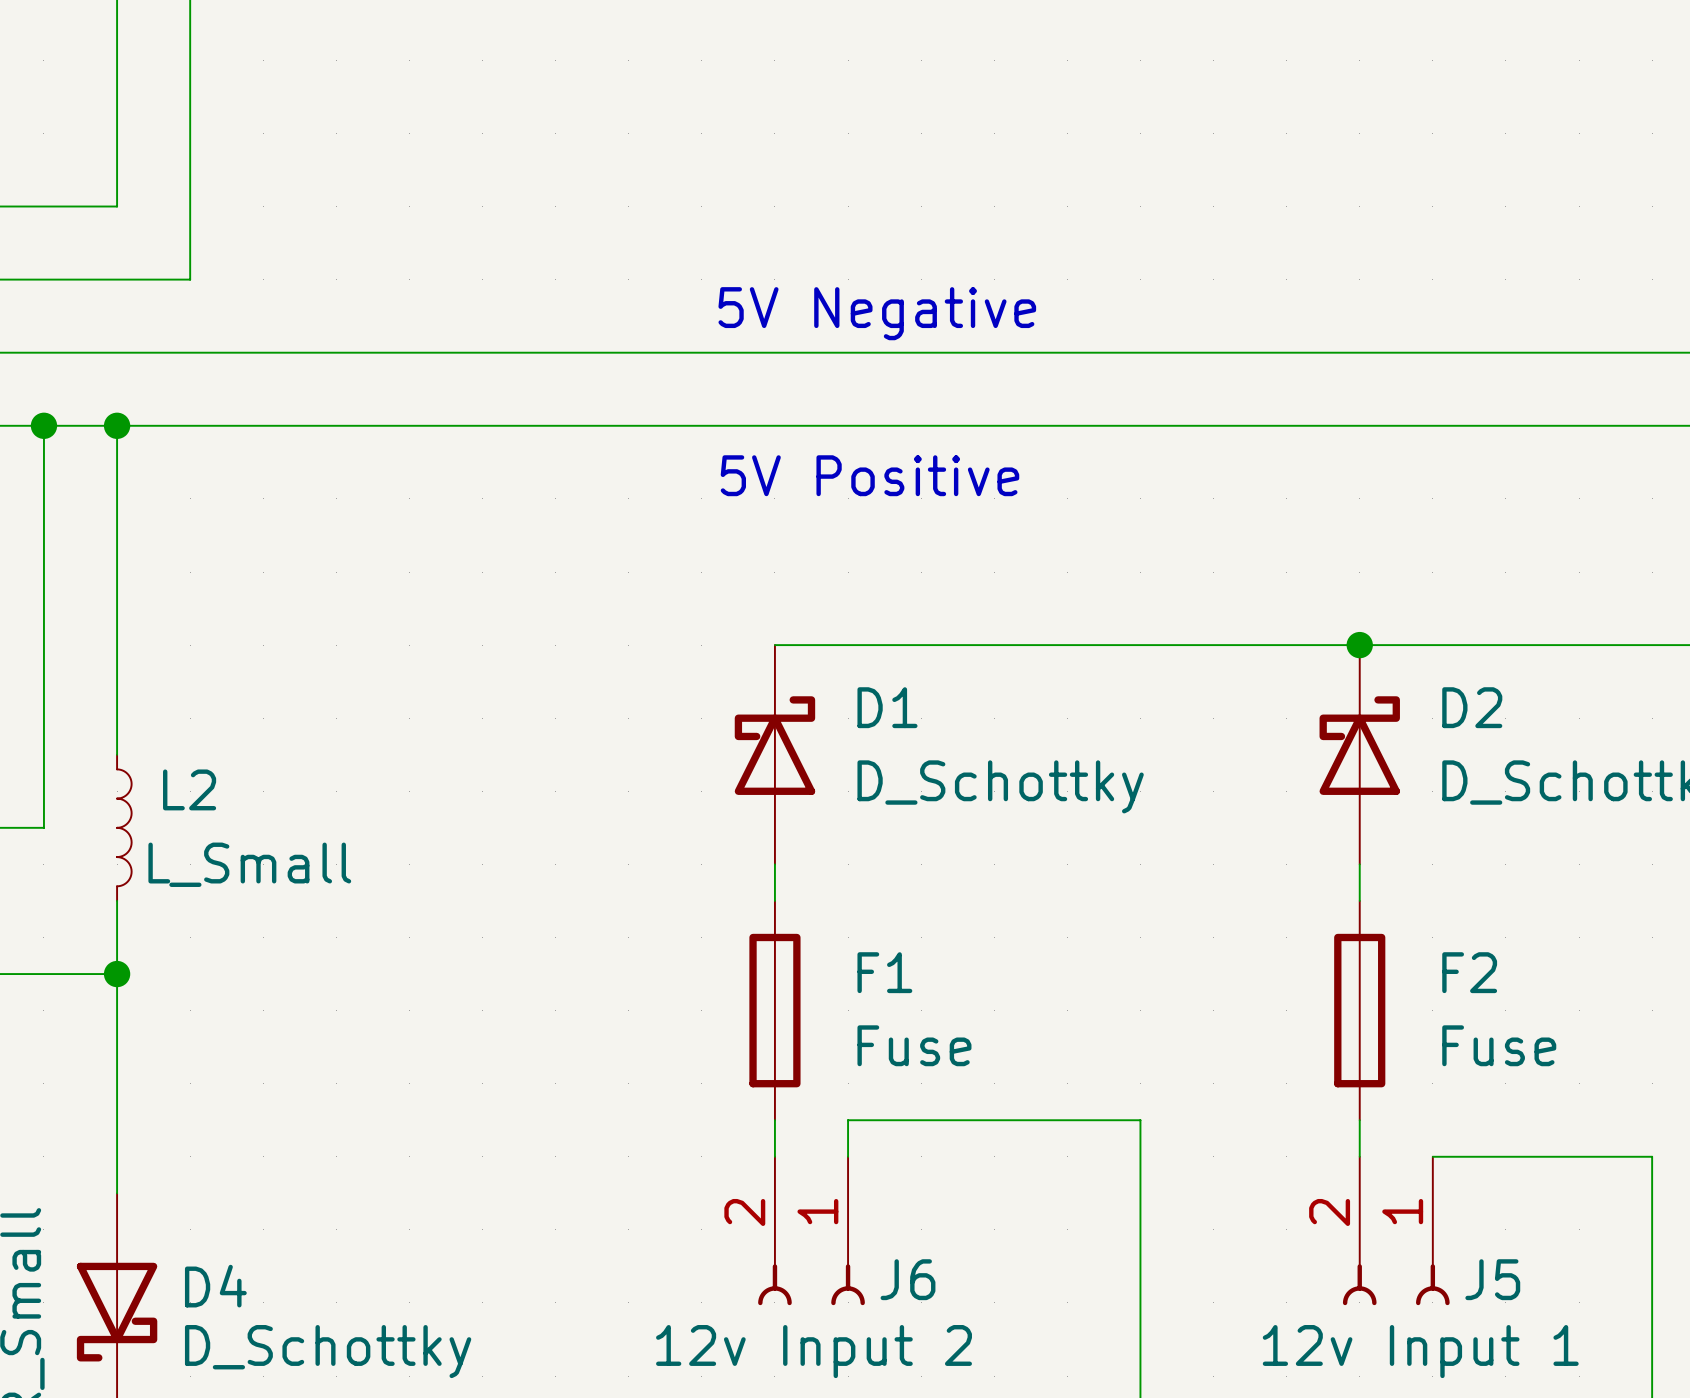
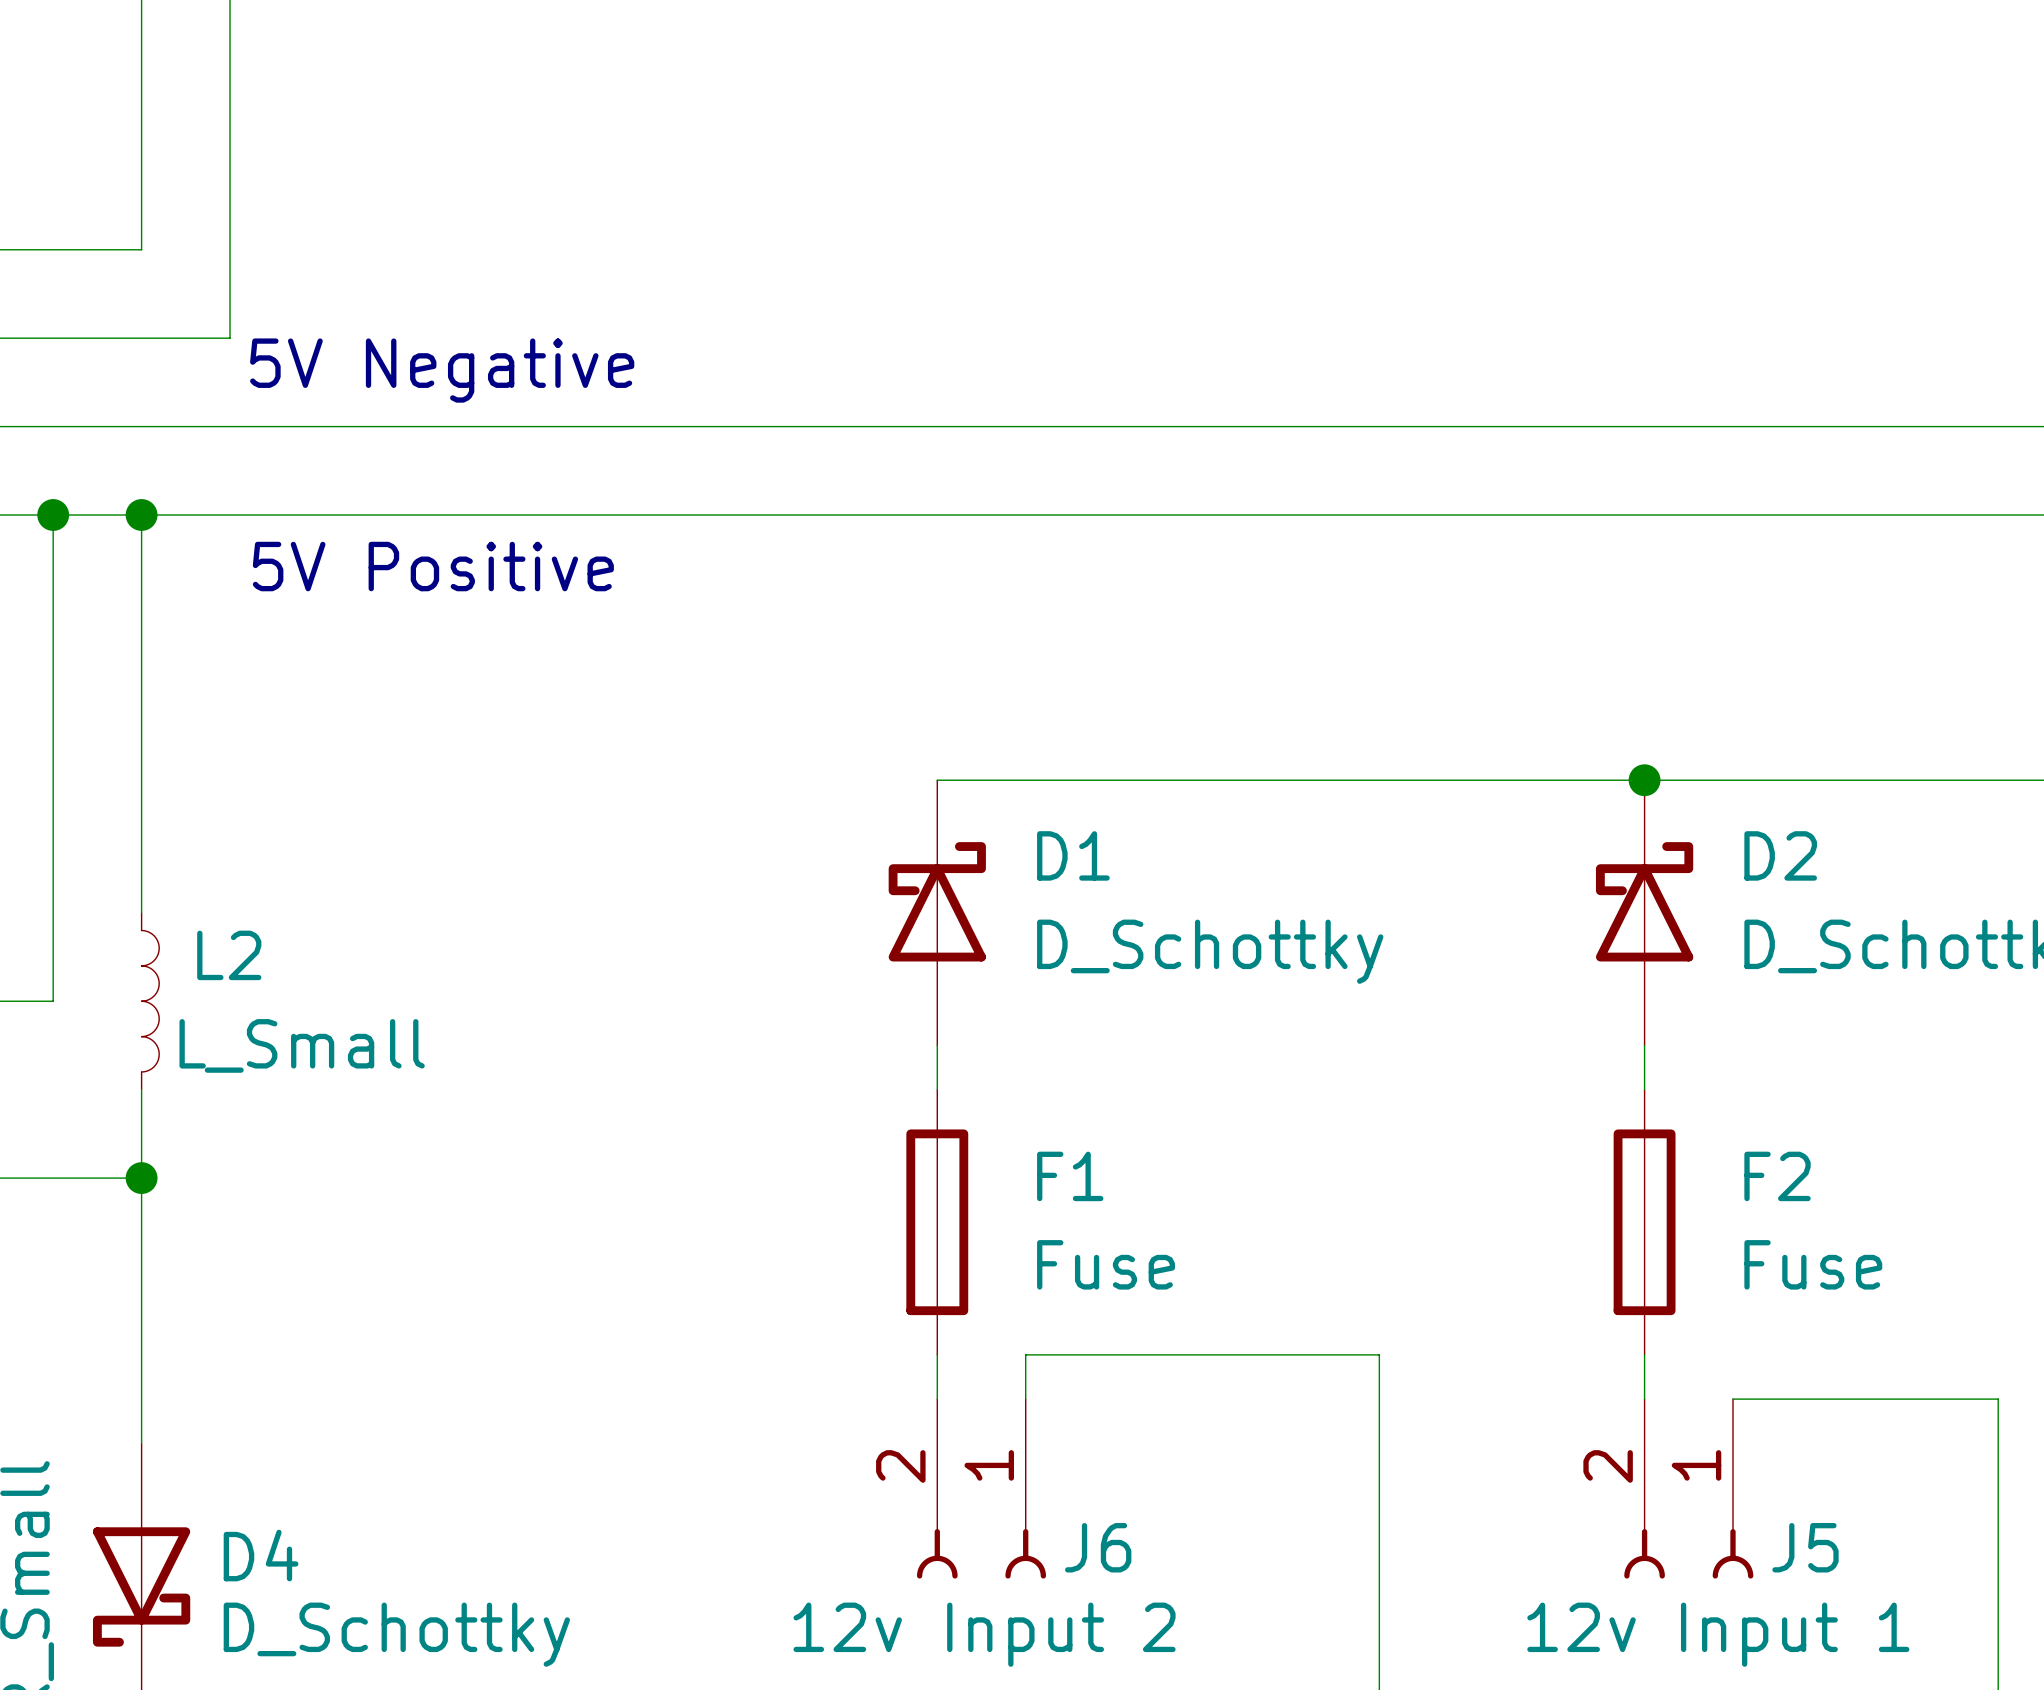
text position: 5V Negative (877, 313) -> 5V Negative (442, 370)
text position: 5V Positive (869, 475) -> 5V Positive (433, 566)

